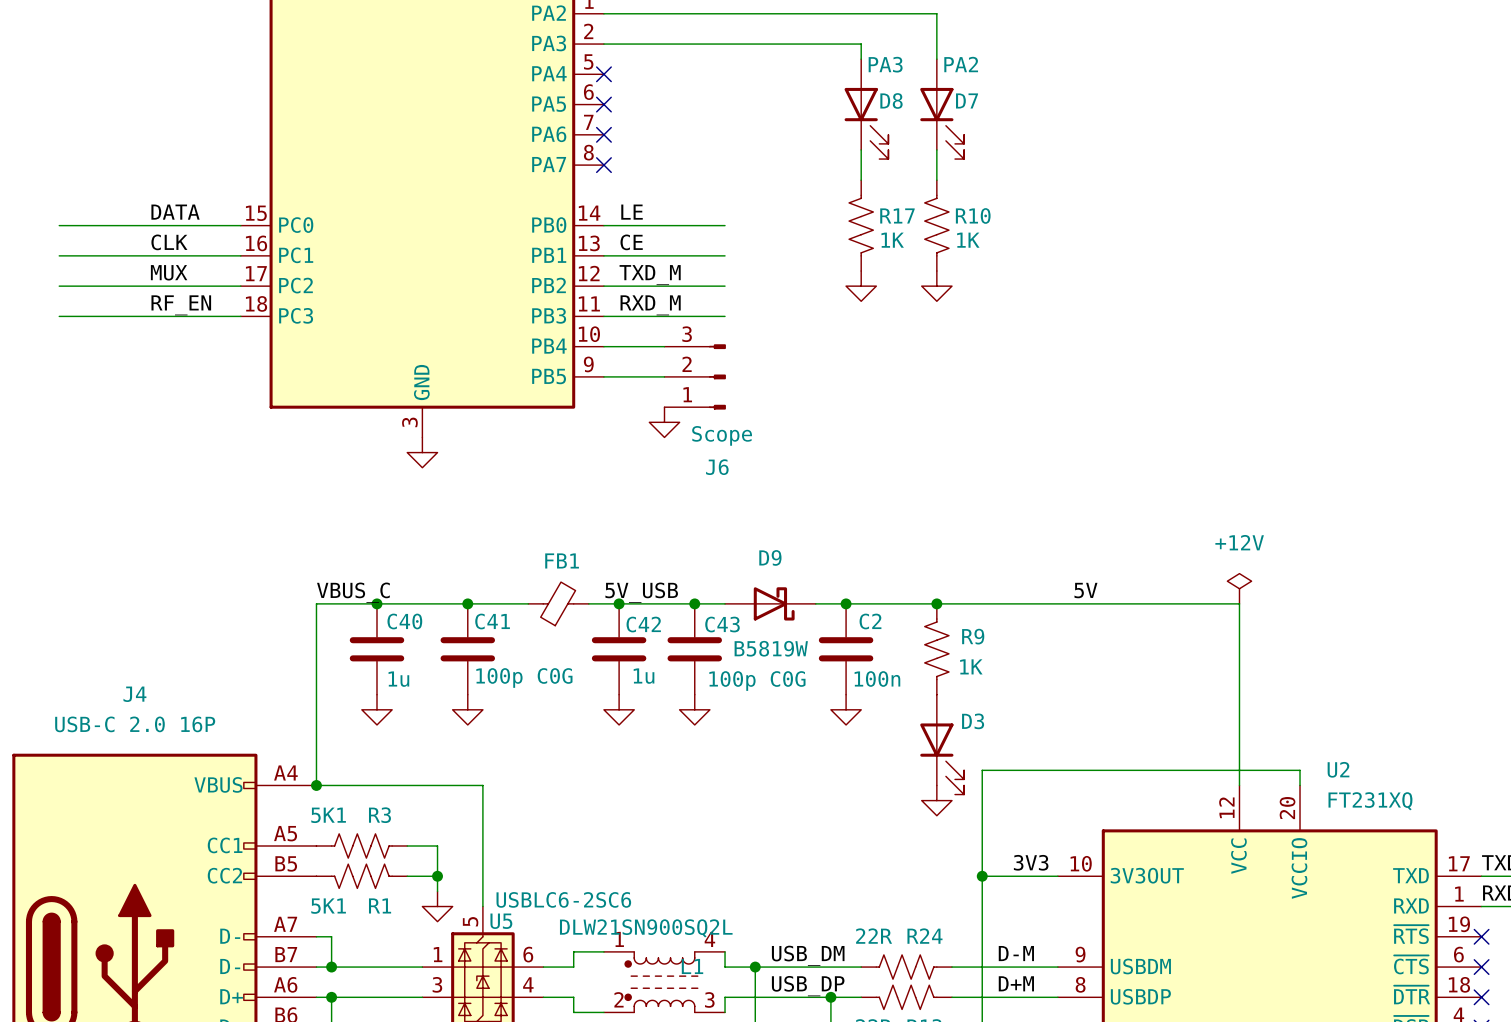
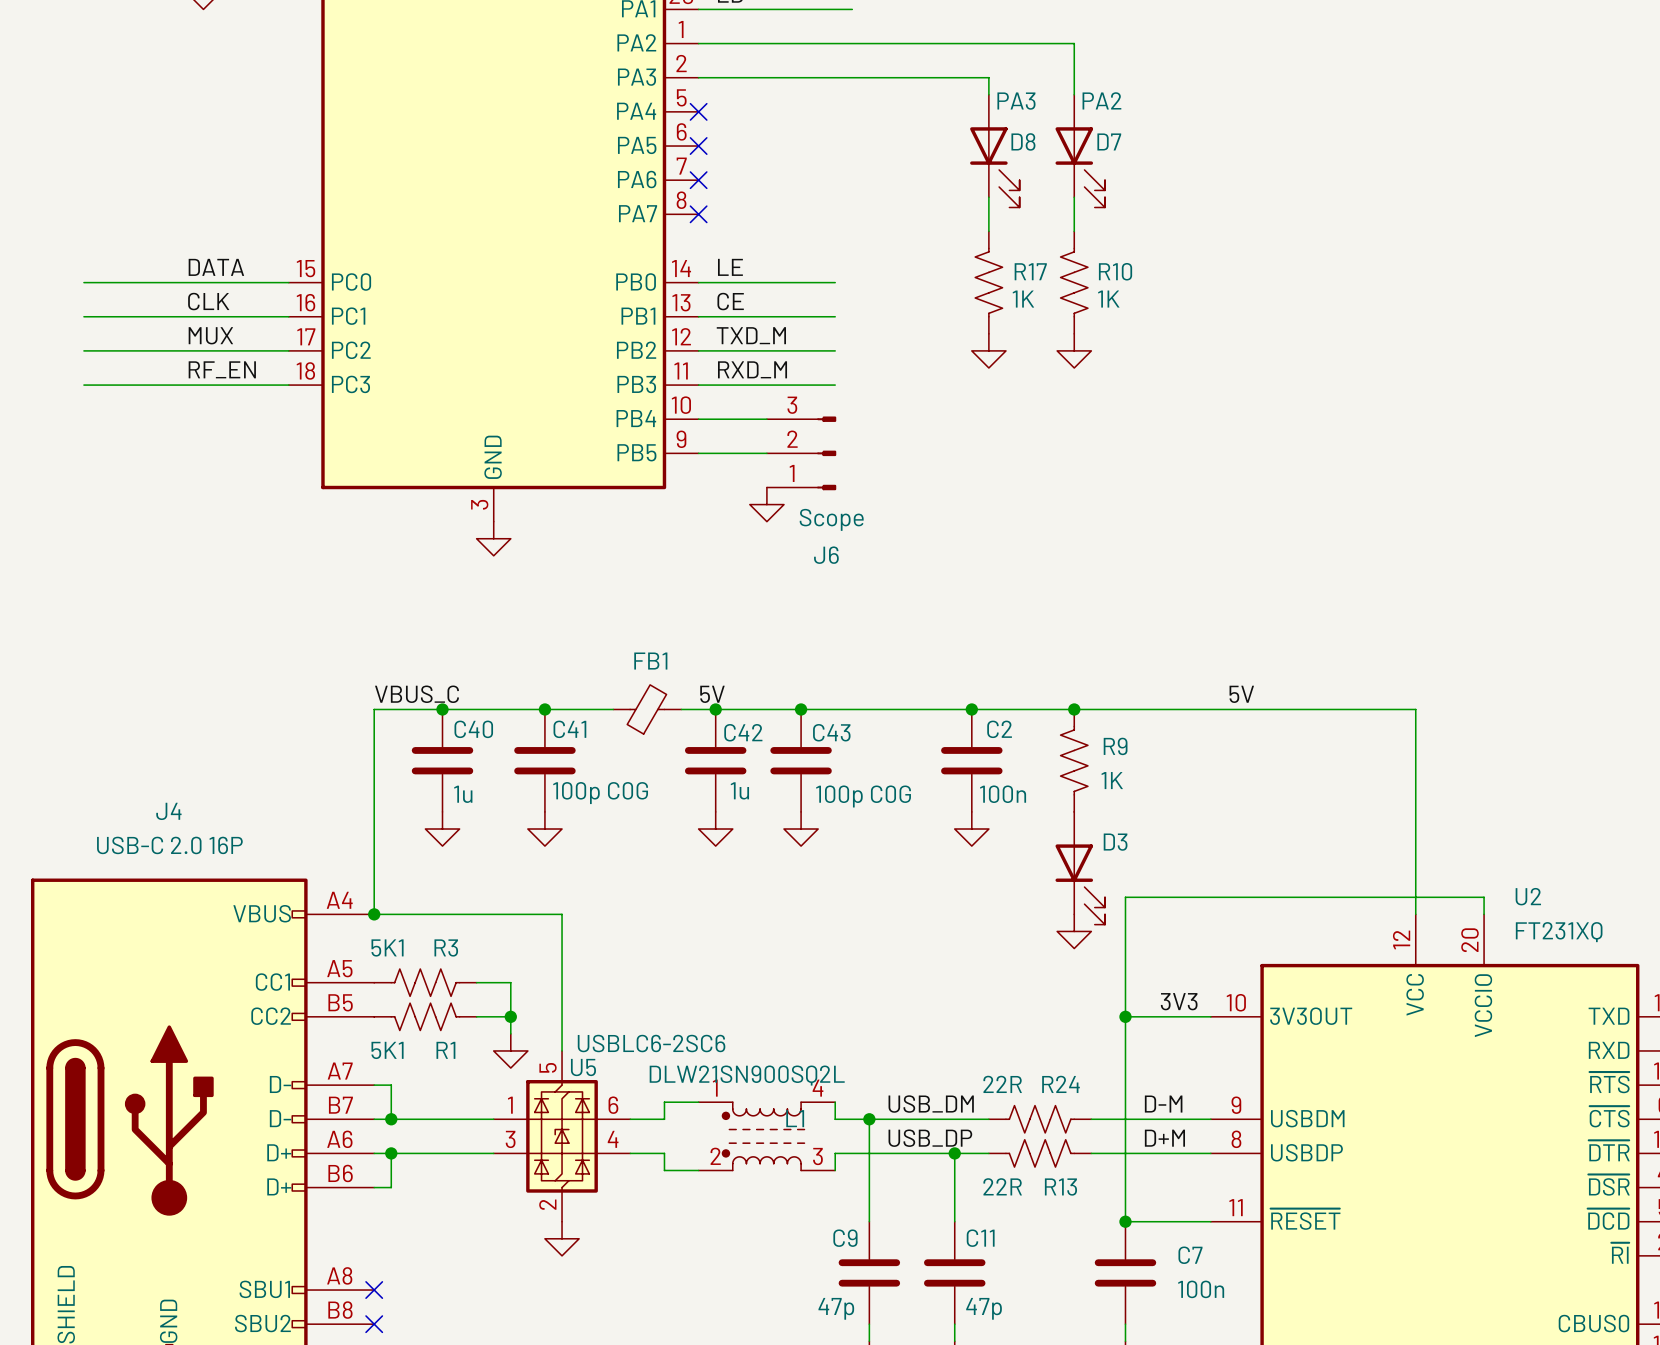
power symbol: +12V (1239, 588) -> none
label: 5V_USB (641, 592) -> 5V (712, 694)
D9: B5819W (770, 603) -> none

